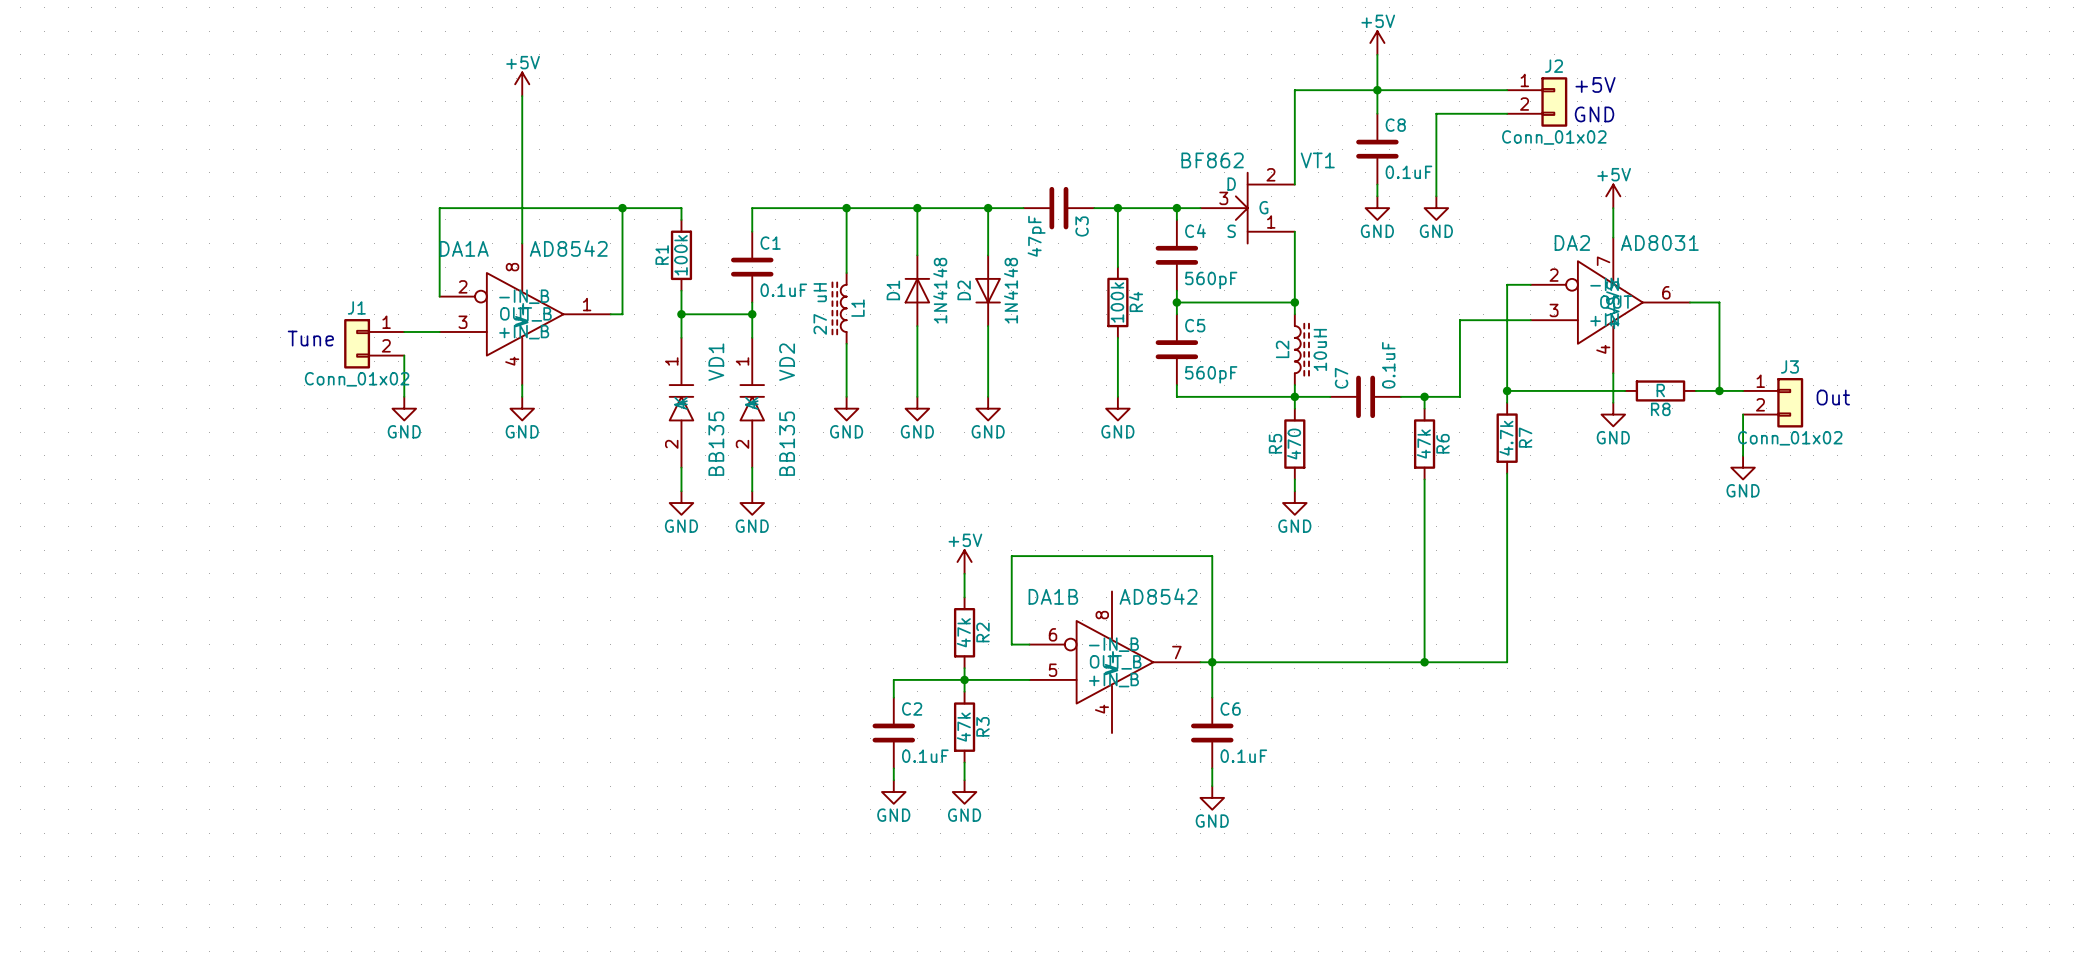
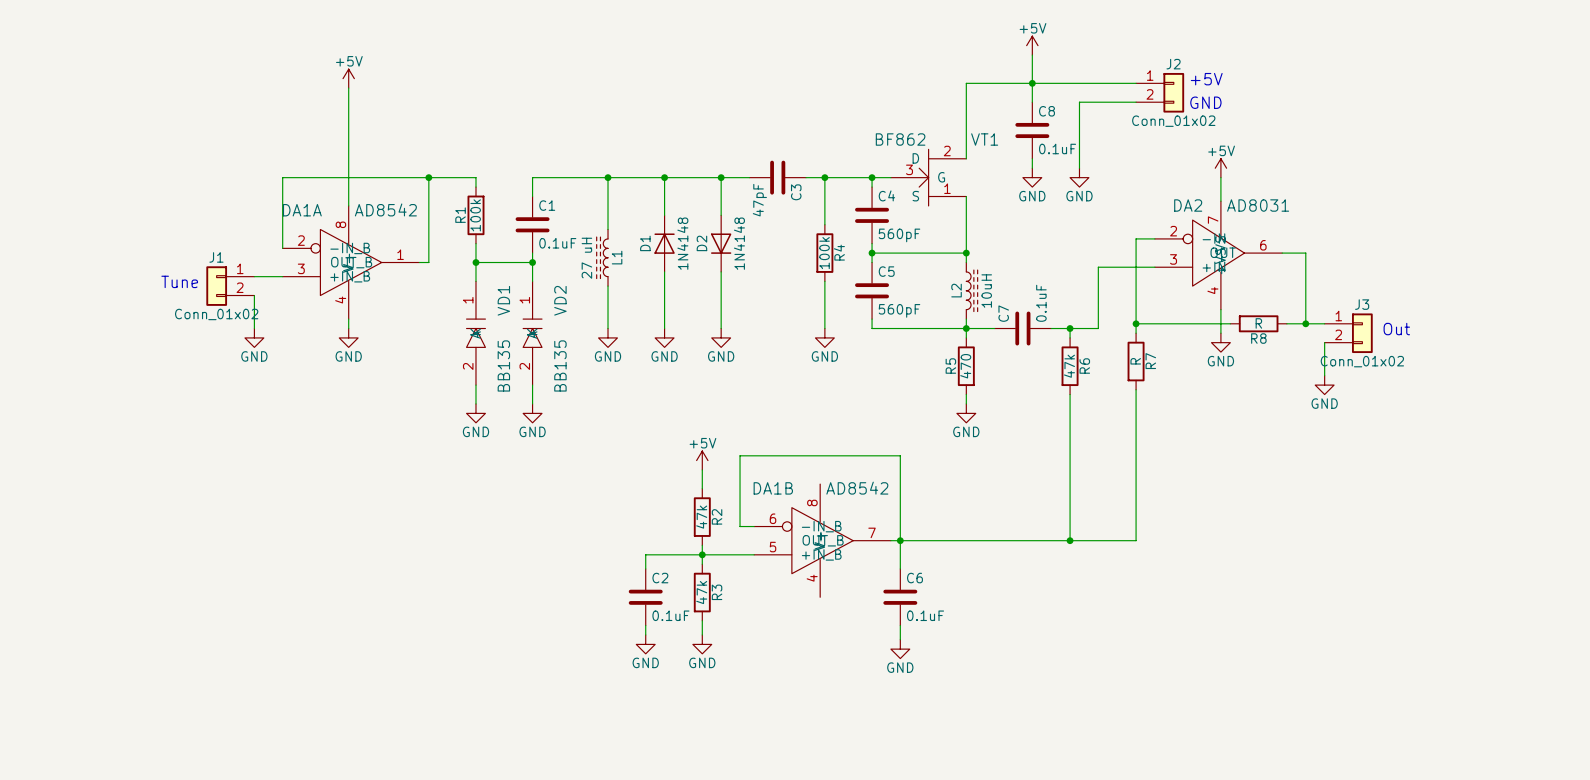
R7 value: 4.7k (1506, 438) -> R (1135, 361)

